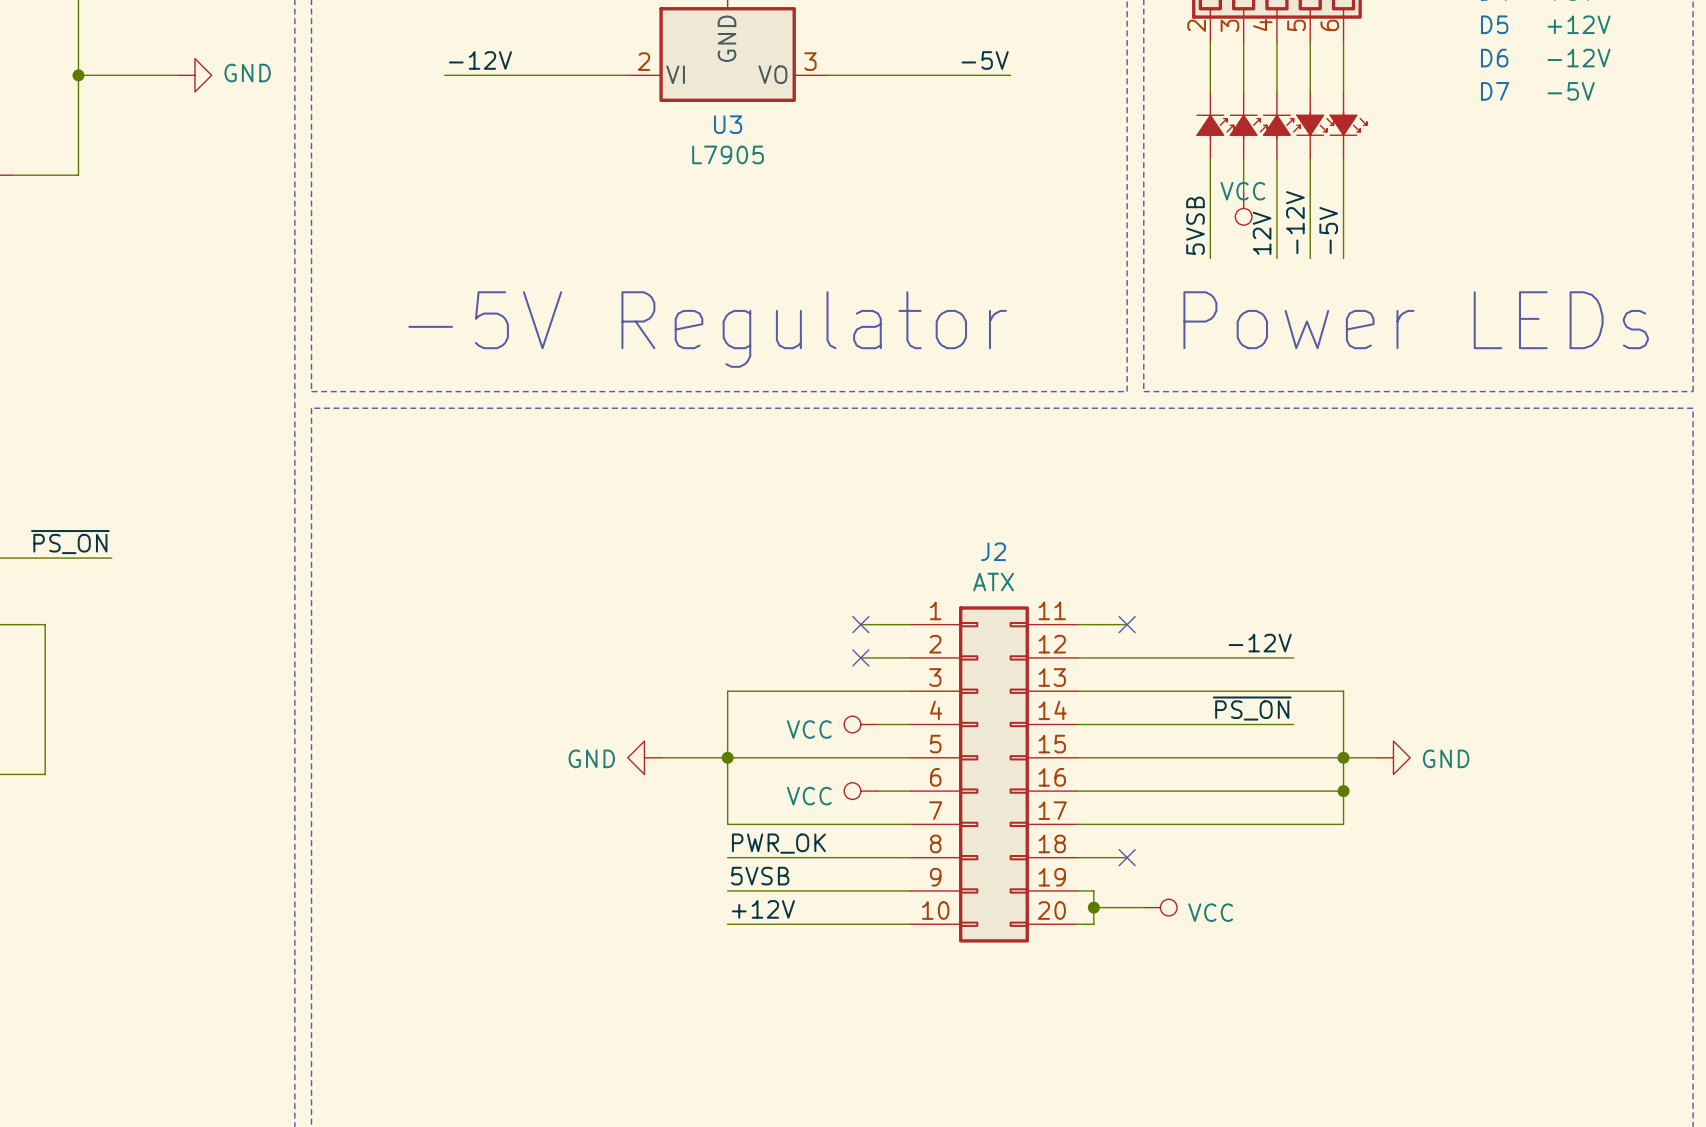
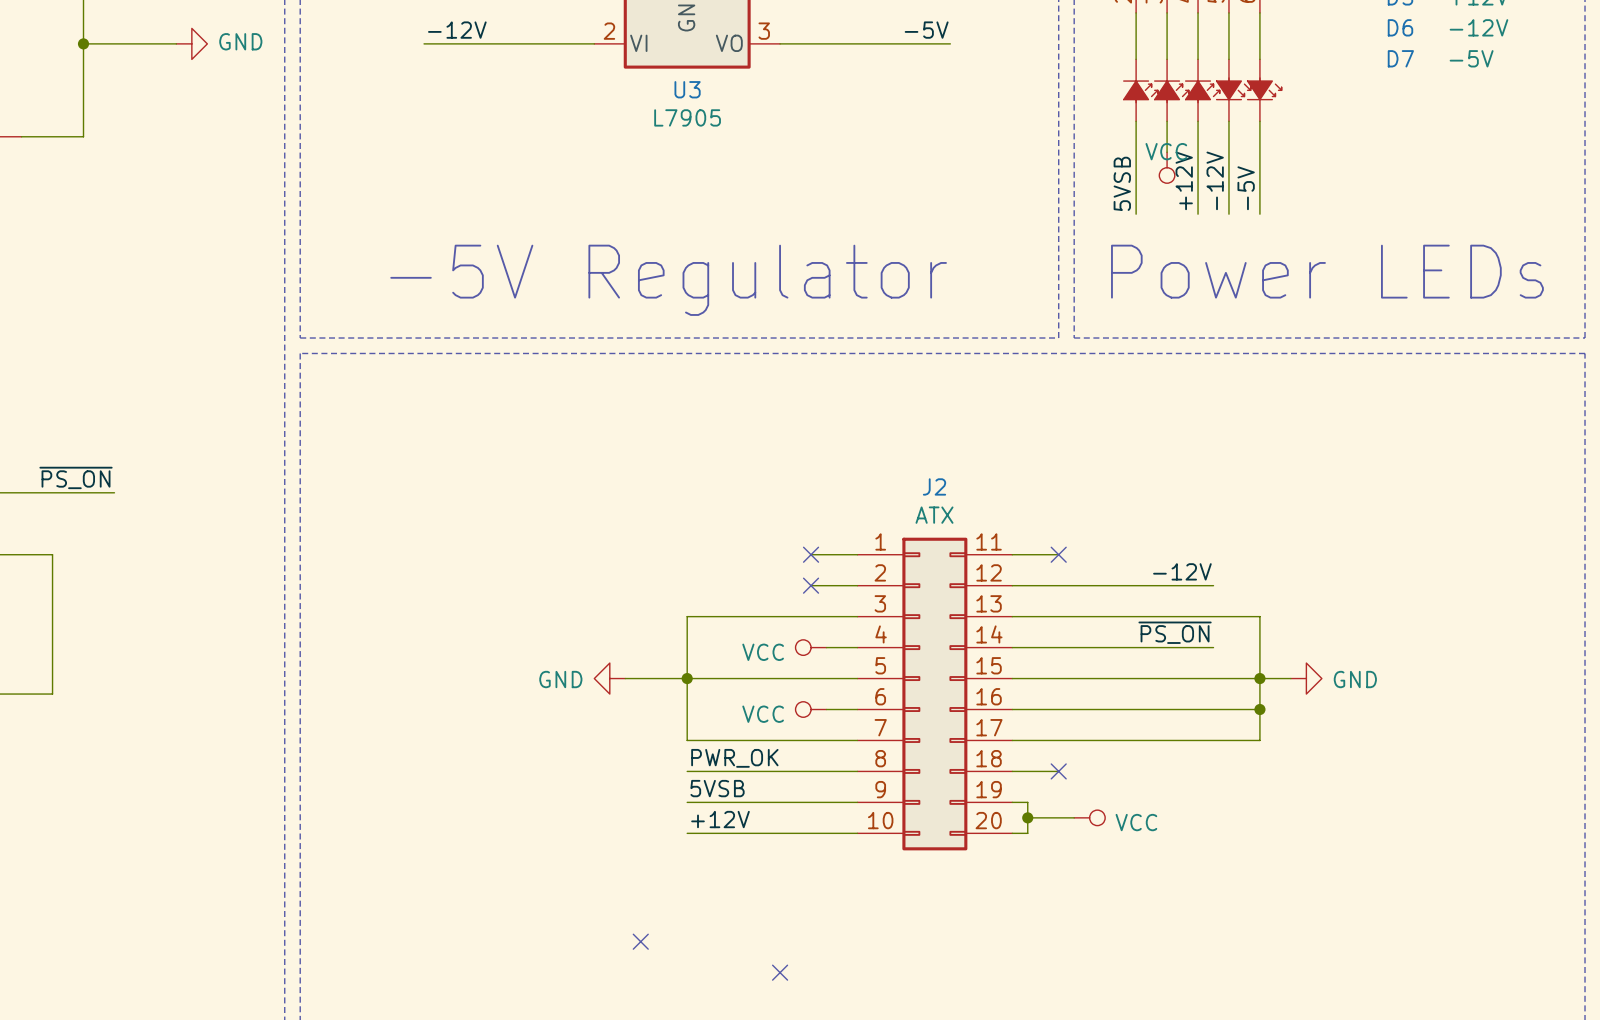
label: 12V (1262, 233) -> +12V (1184, 180)
no-connect mark: none -> (640, 941)
no-connect mark: none -> (780, 972)

